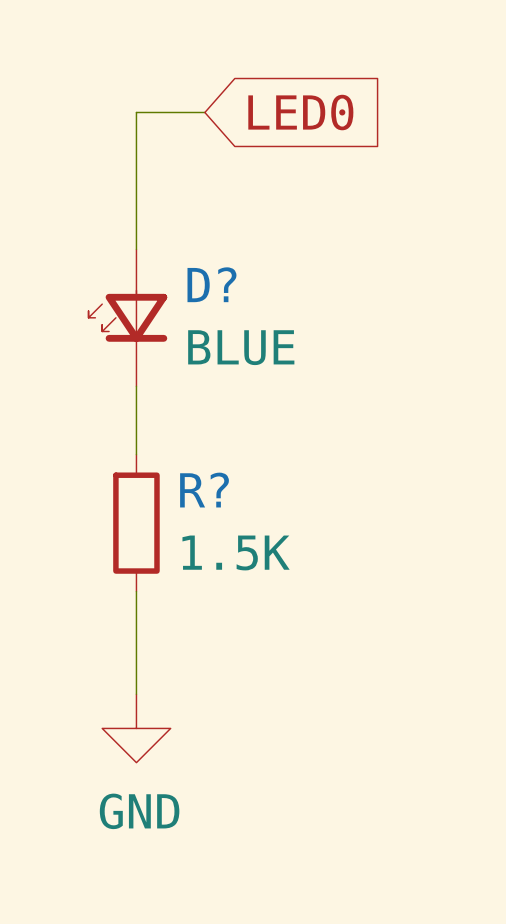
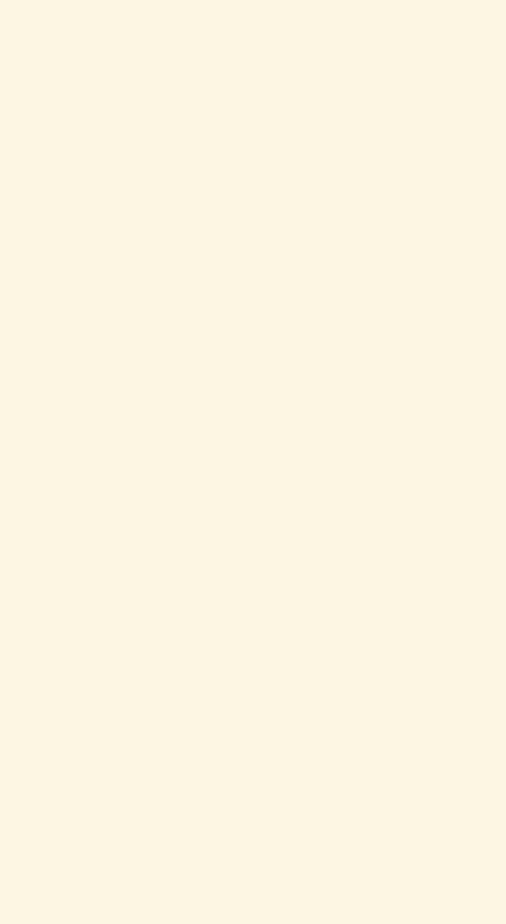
wire: (204, 112) (136, 112) (136, 249) -> none
global label: LED0 (300, 112) -> none
D?: BLUE (127, 317) -> none
wire: (136, 386) (136, 454) -> none
R?: 1.5K (136, 523) -> none
wire: (136, 591) (136, 694) -> none
power symbol: GND (136, 728) -> none

